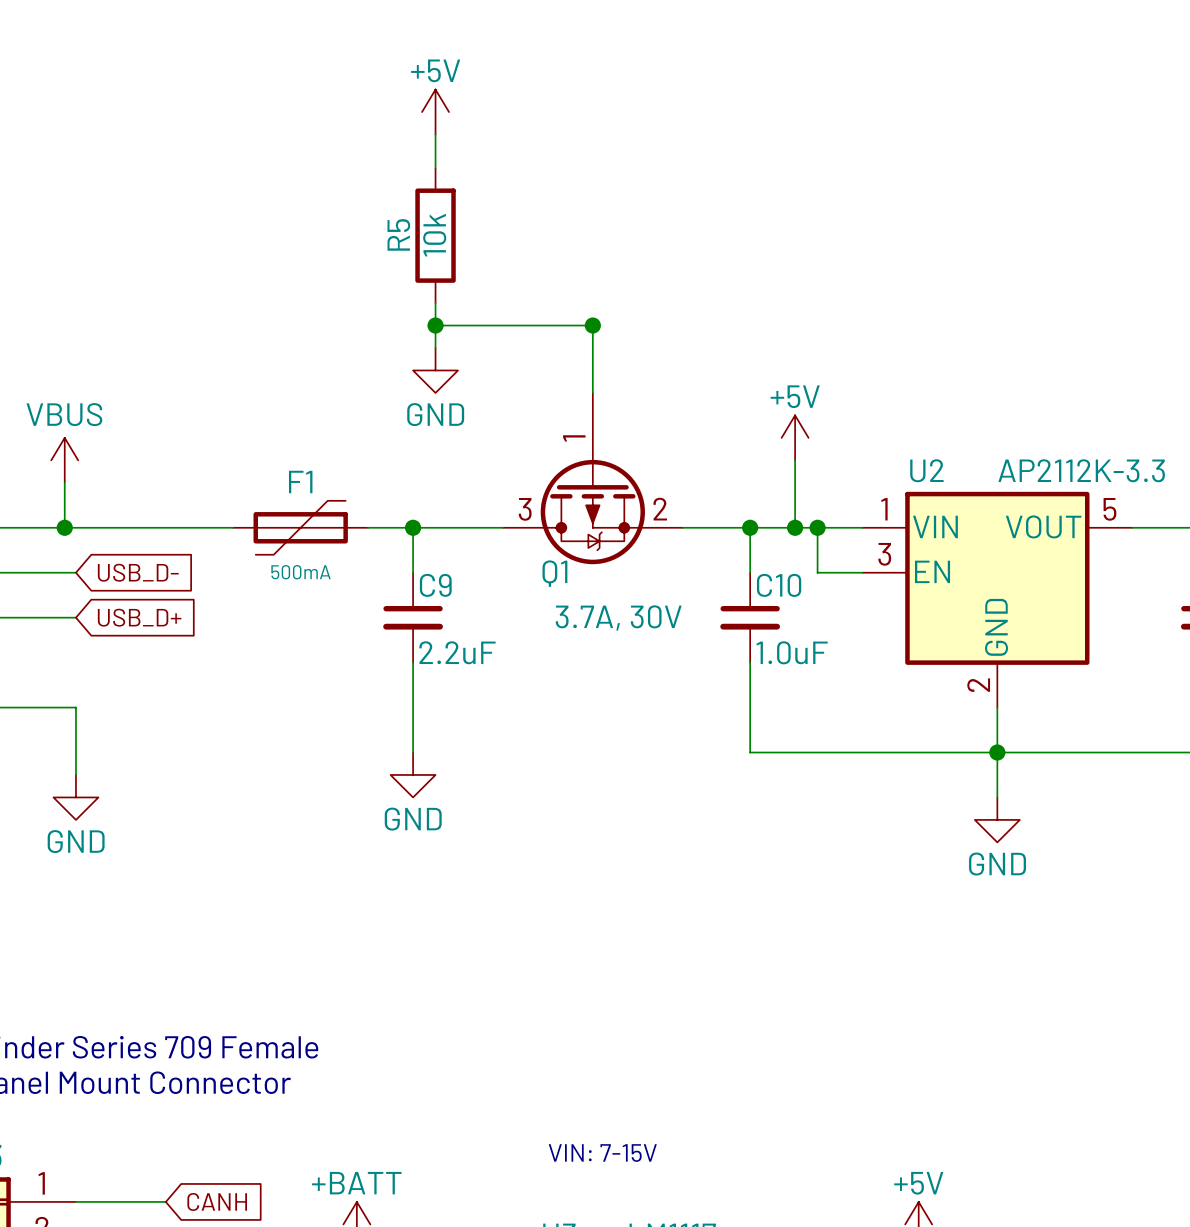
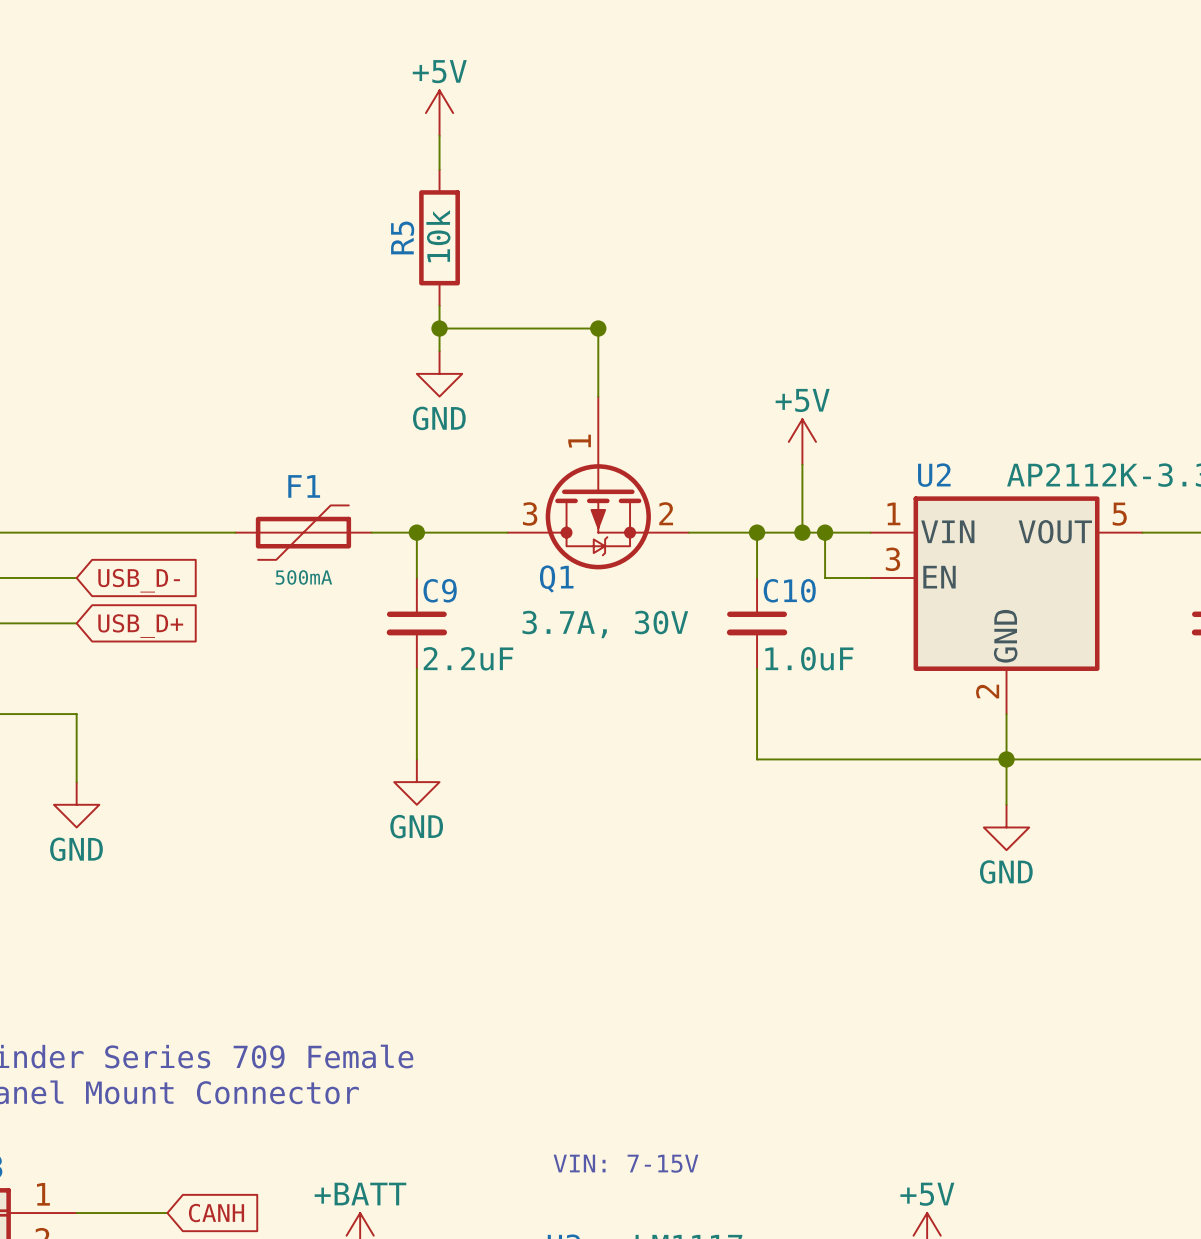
power symbol: VBUS (64, 460) -> none
wire: (64, 482) (64, 527) -> none
junction: (64, 527) -> none

